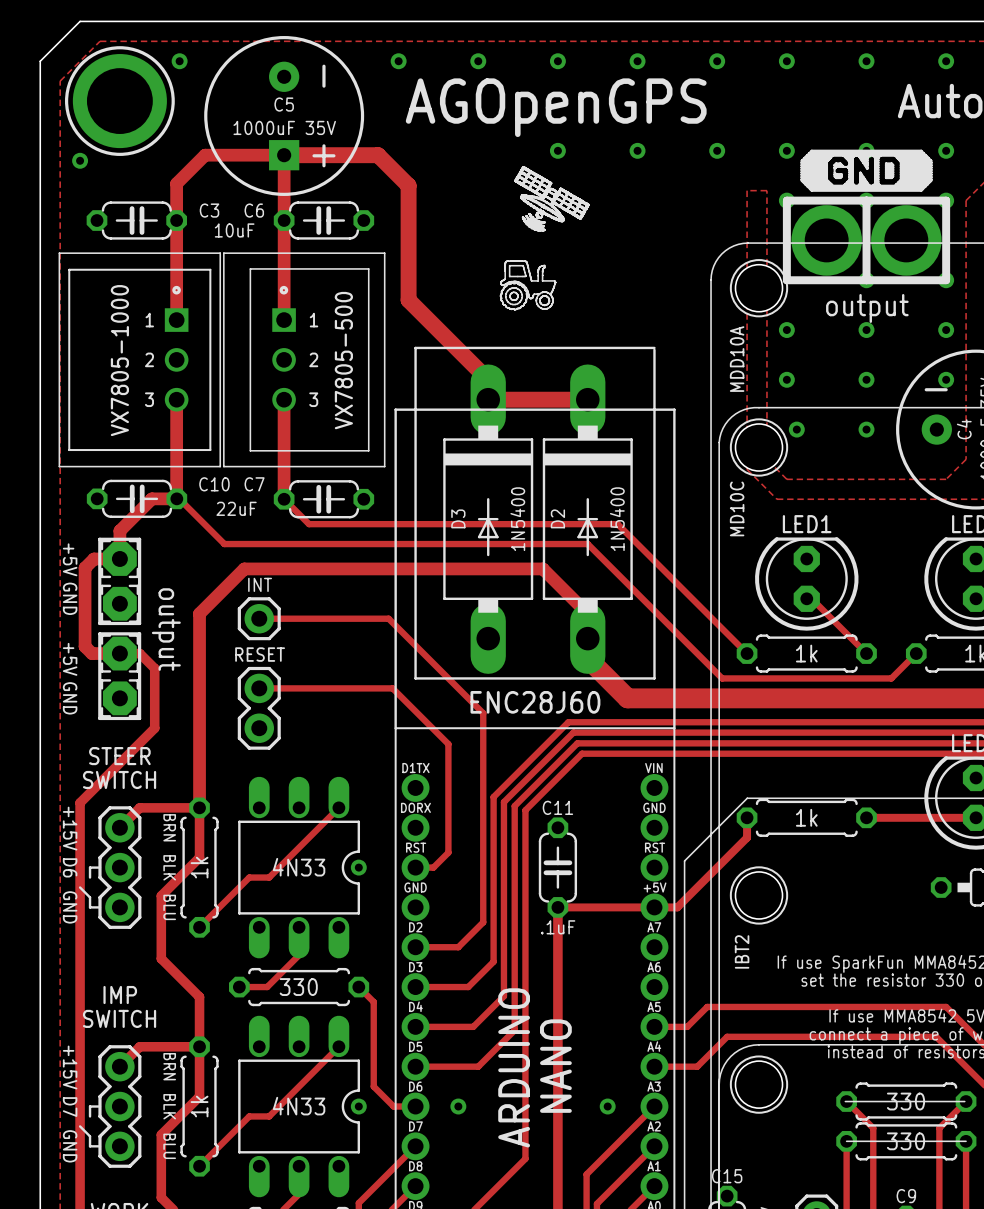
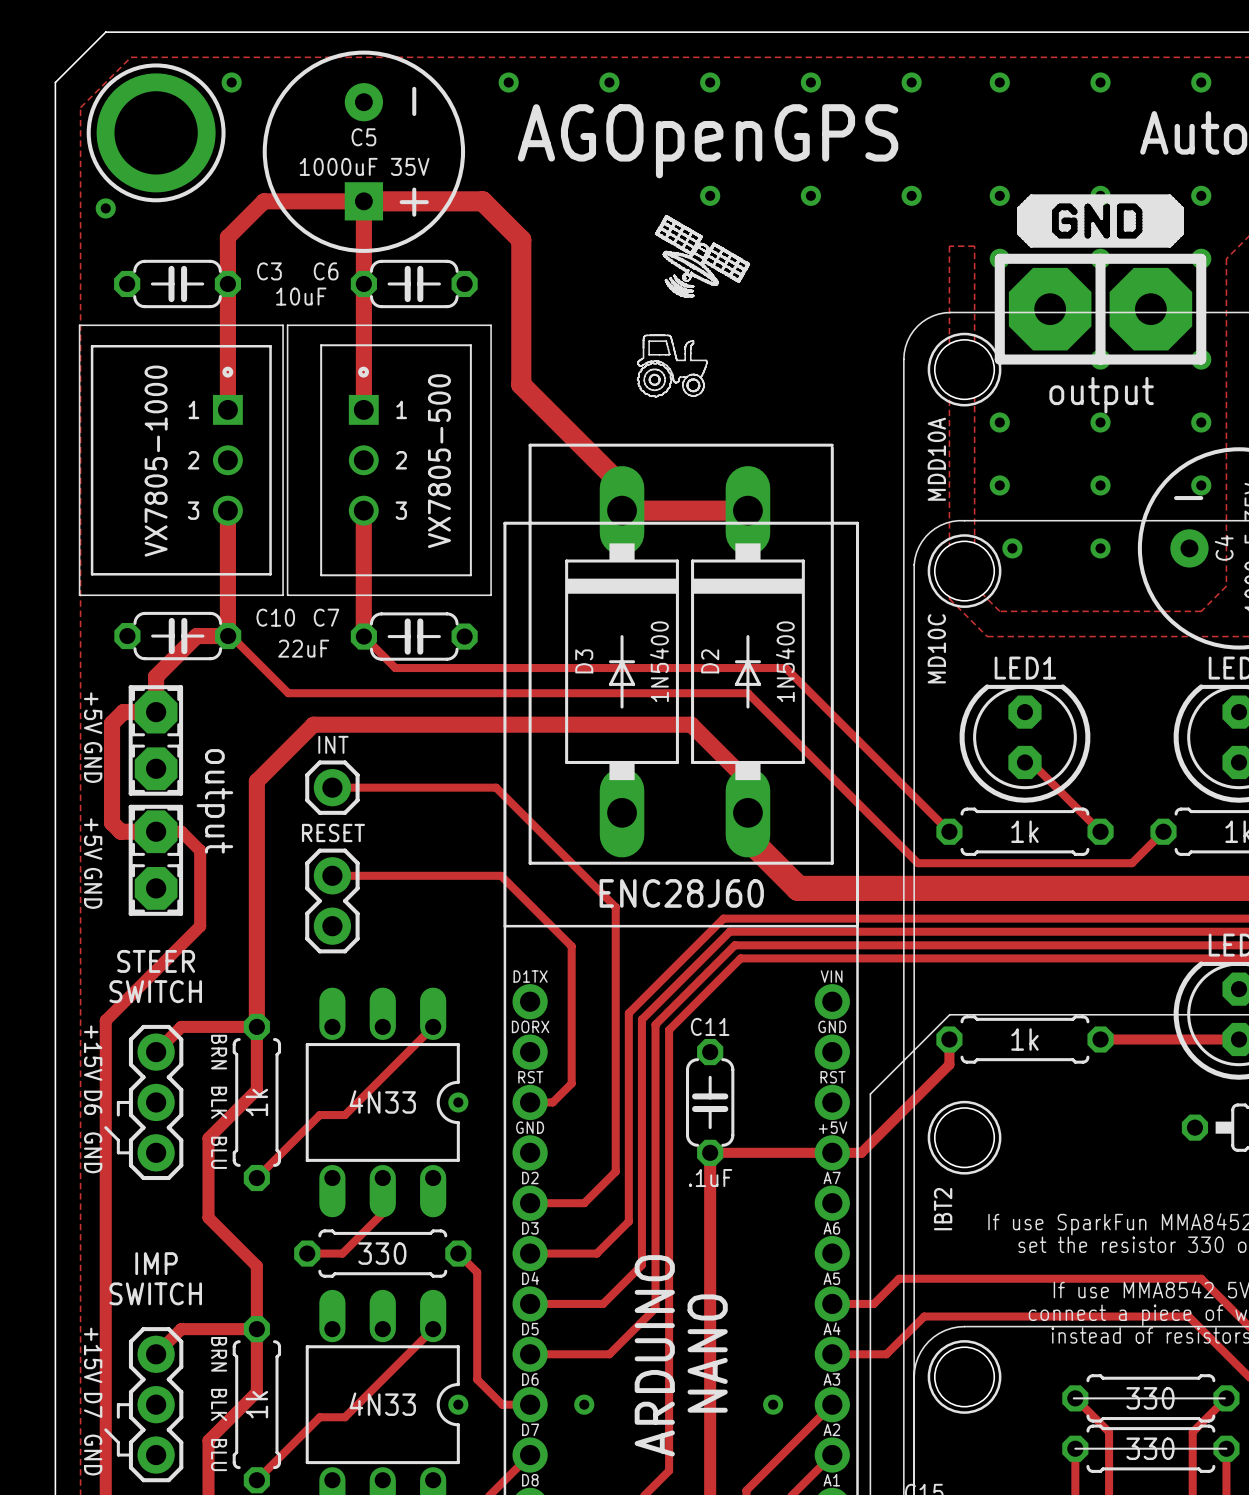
via: (826, 240) -> none
part: none -> (1050, 309)
via: (906, 240) -> none
part: none -> (1150, 309)

